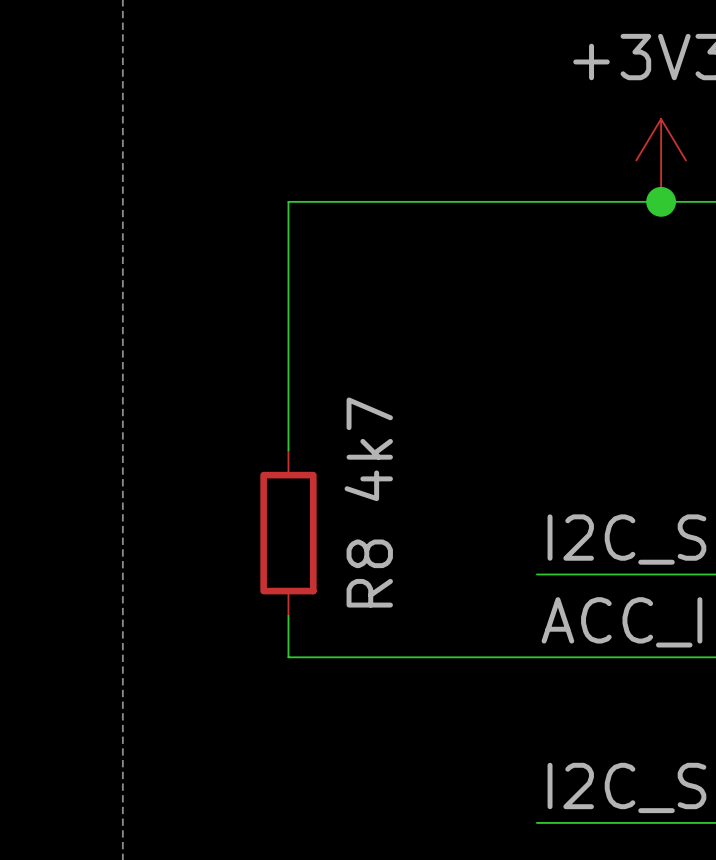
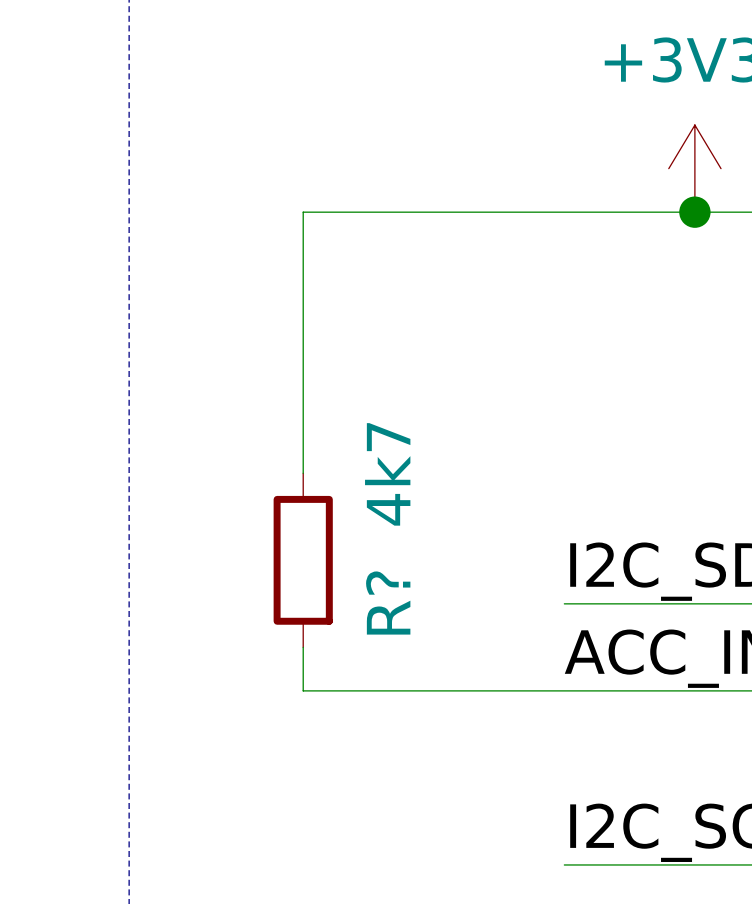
R8 name: R8 (369, 573) -> R? (388, 603)

